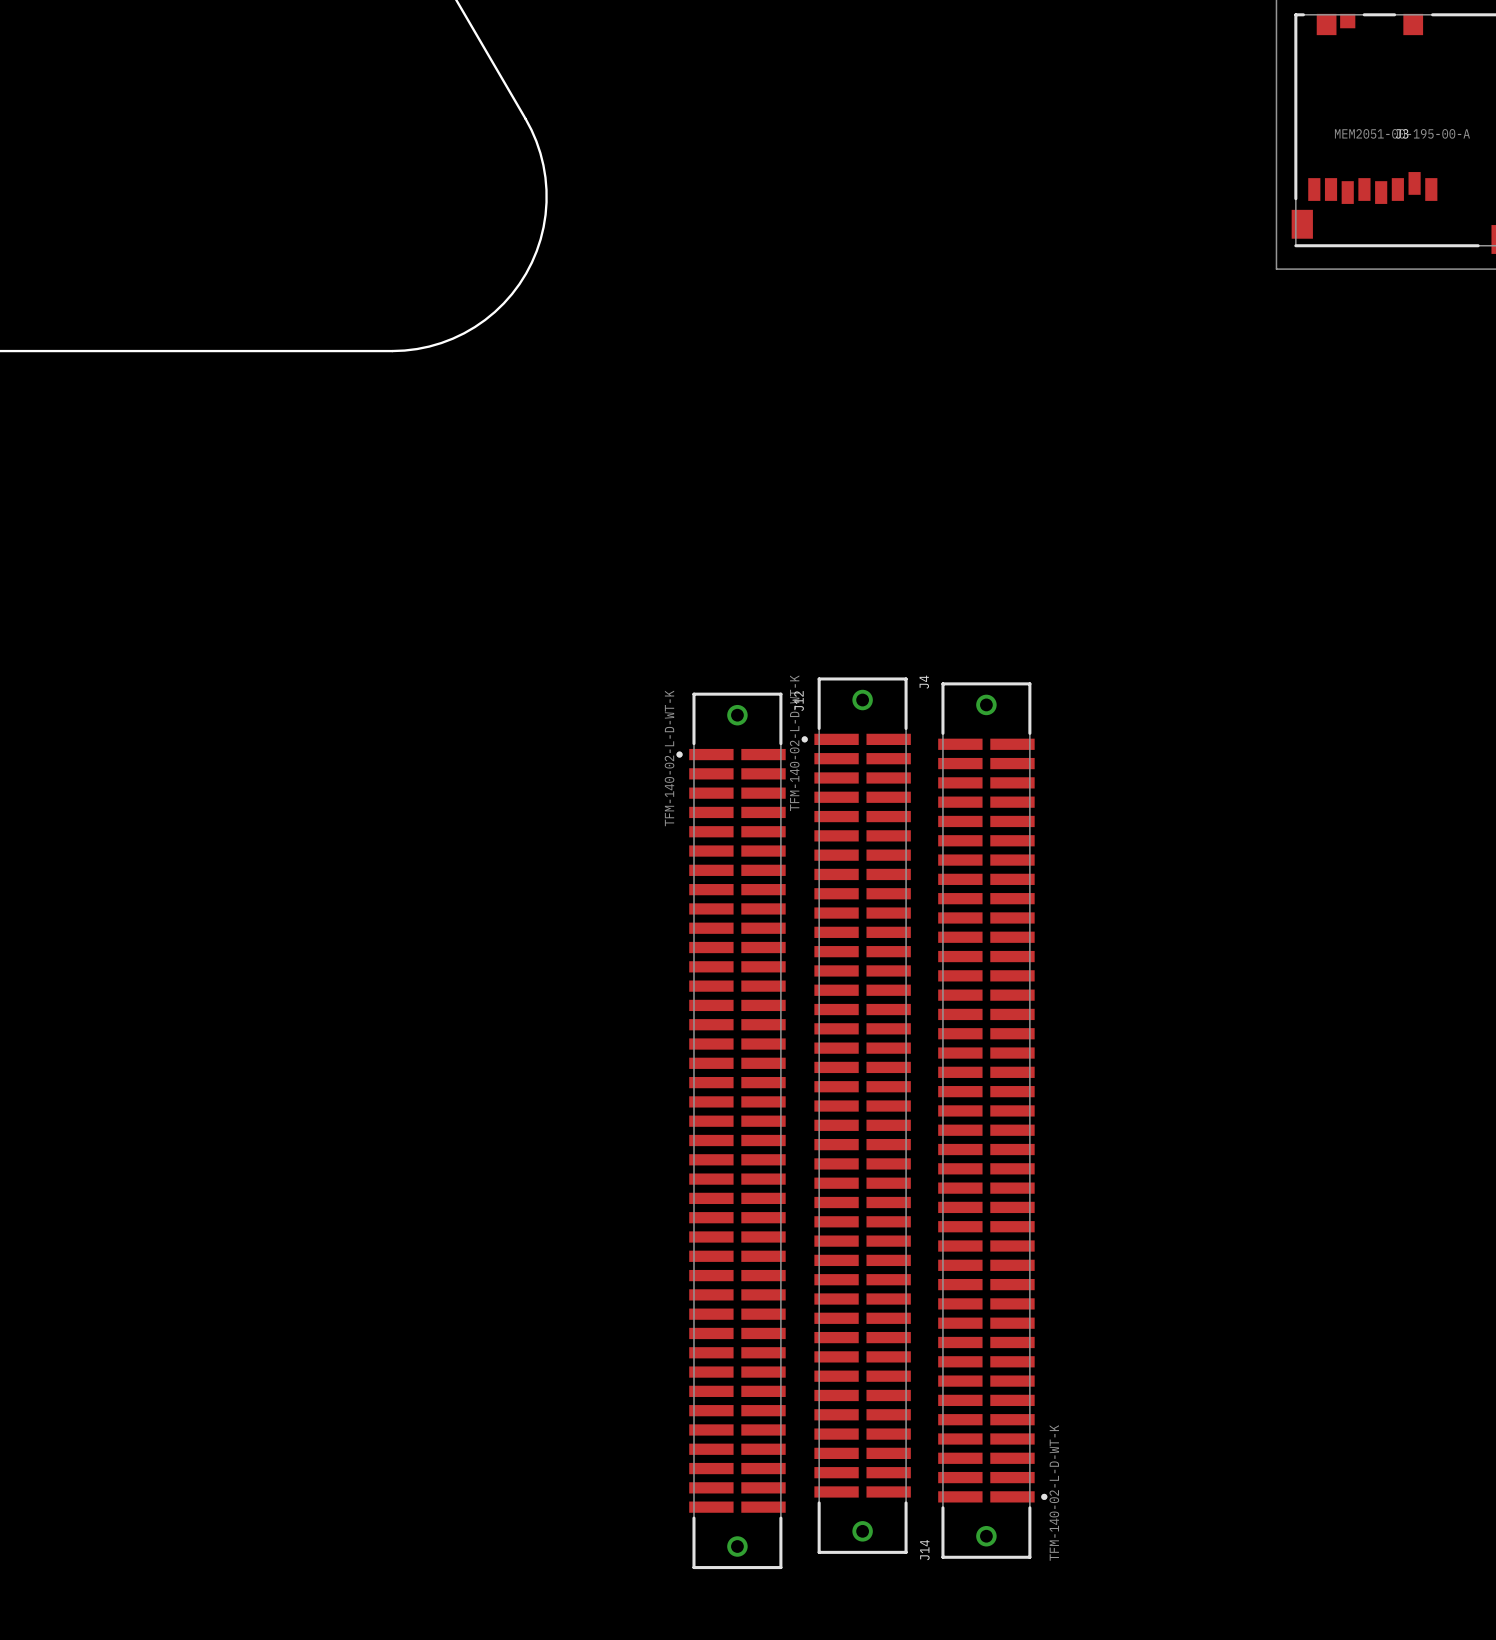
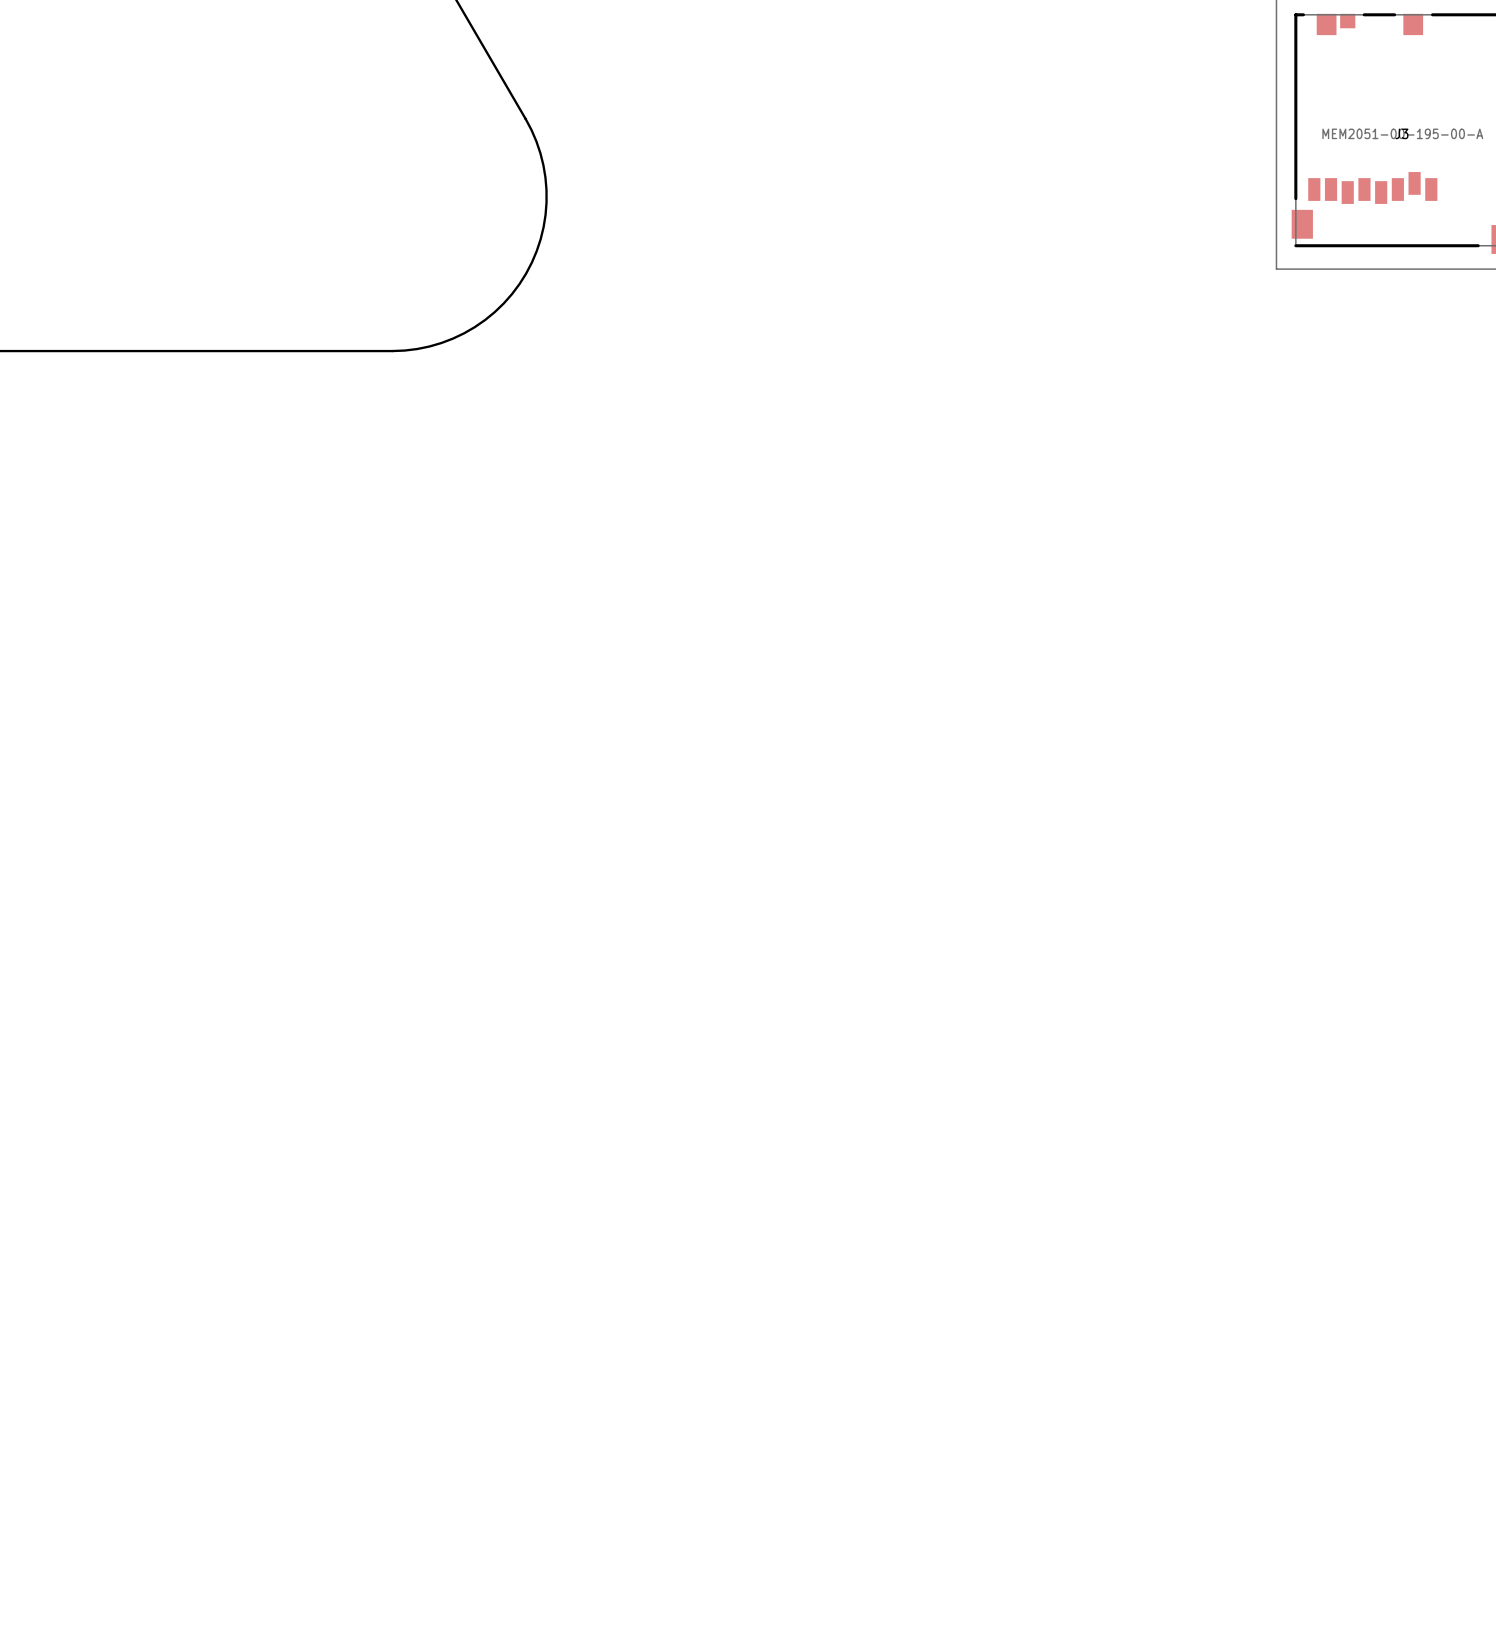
J4: TFM-140-02-L-D-WT-K (856, 1115) -> none
J14: TFM-140-02-L-D-WT-K (992, 1120) -> none
J12: TFM-140-02-L-D-WT-K (731, 1130) -> none

